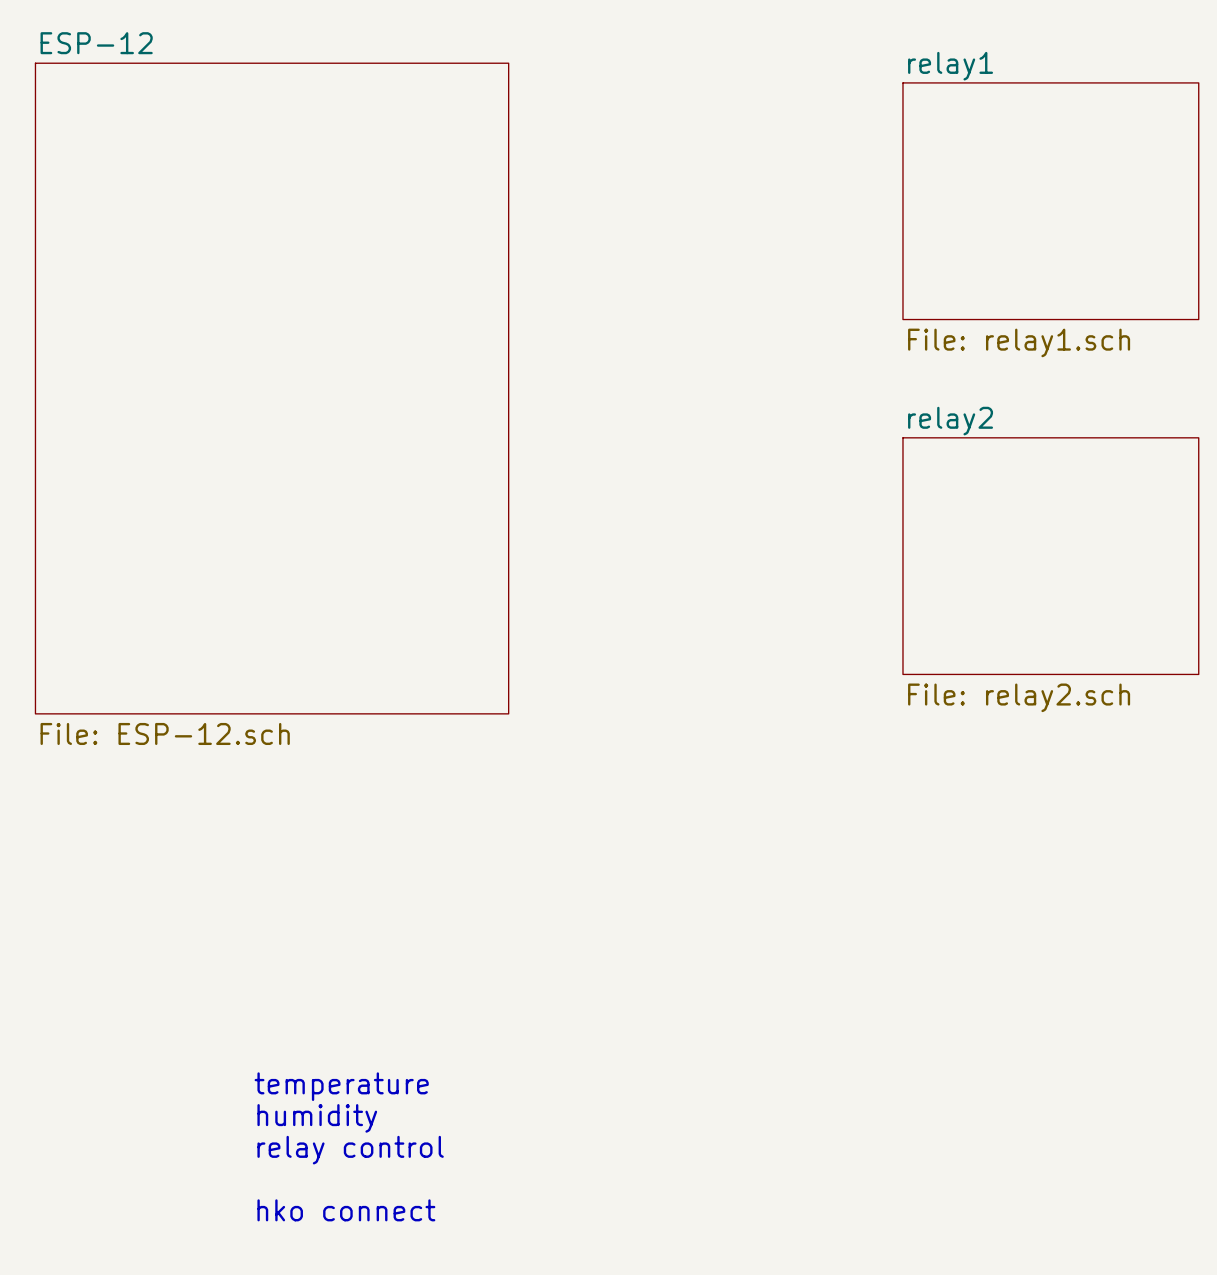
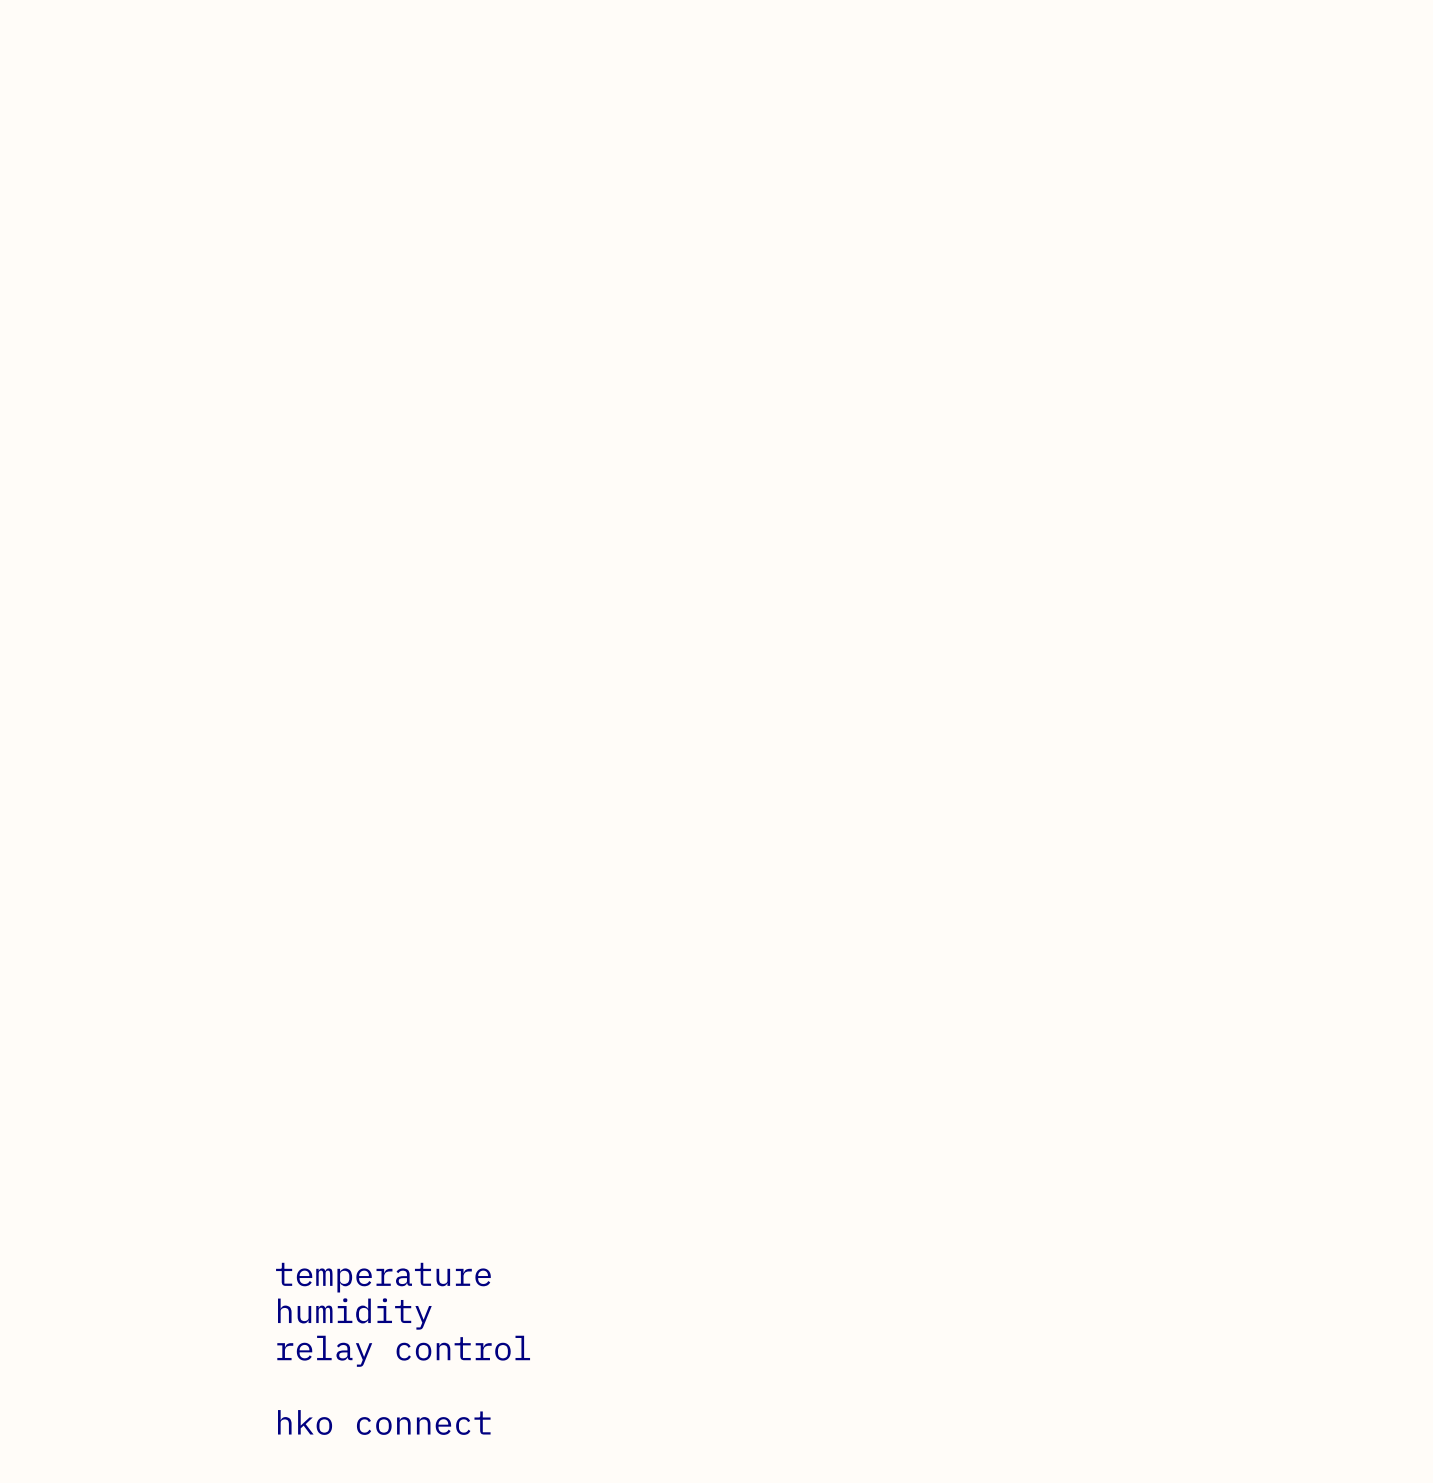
sheet relay1: File: relay1.sch (1050, 201) -> none
sheet ESP-12: File: ESP-12.sch (272, 388) -> none
sheet relay2: File: relay2.sch (1050, 556) -> none

